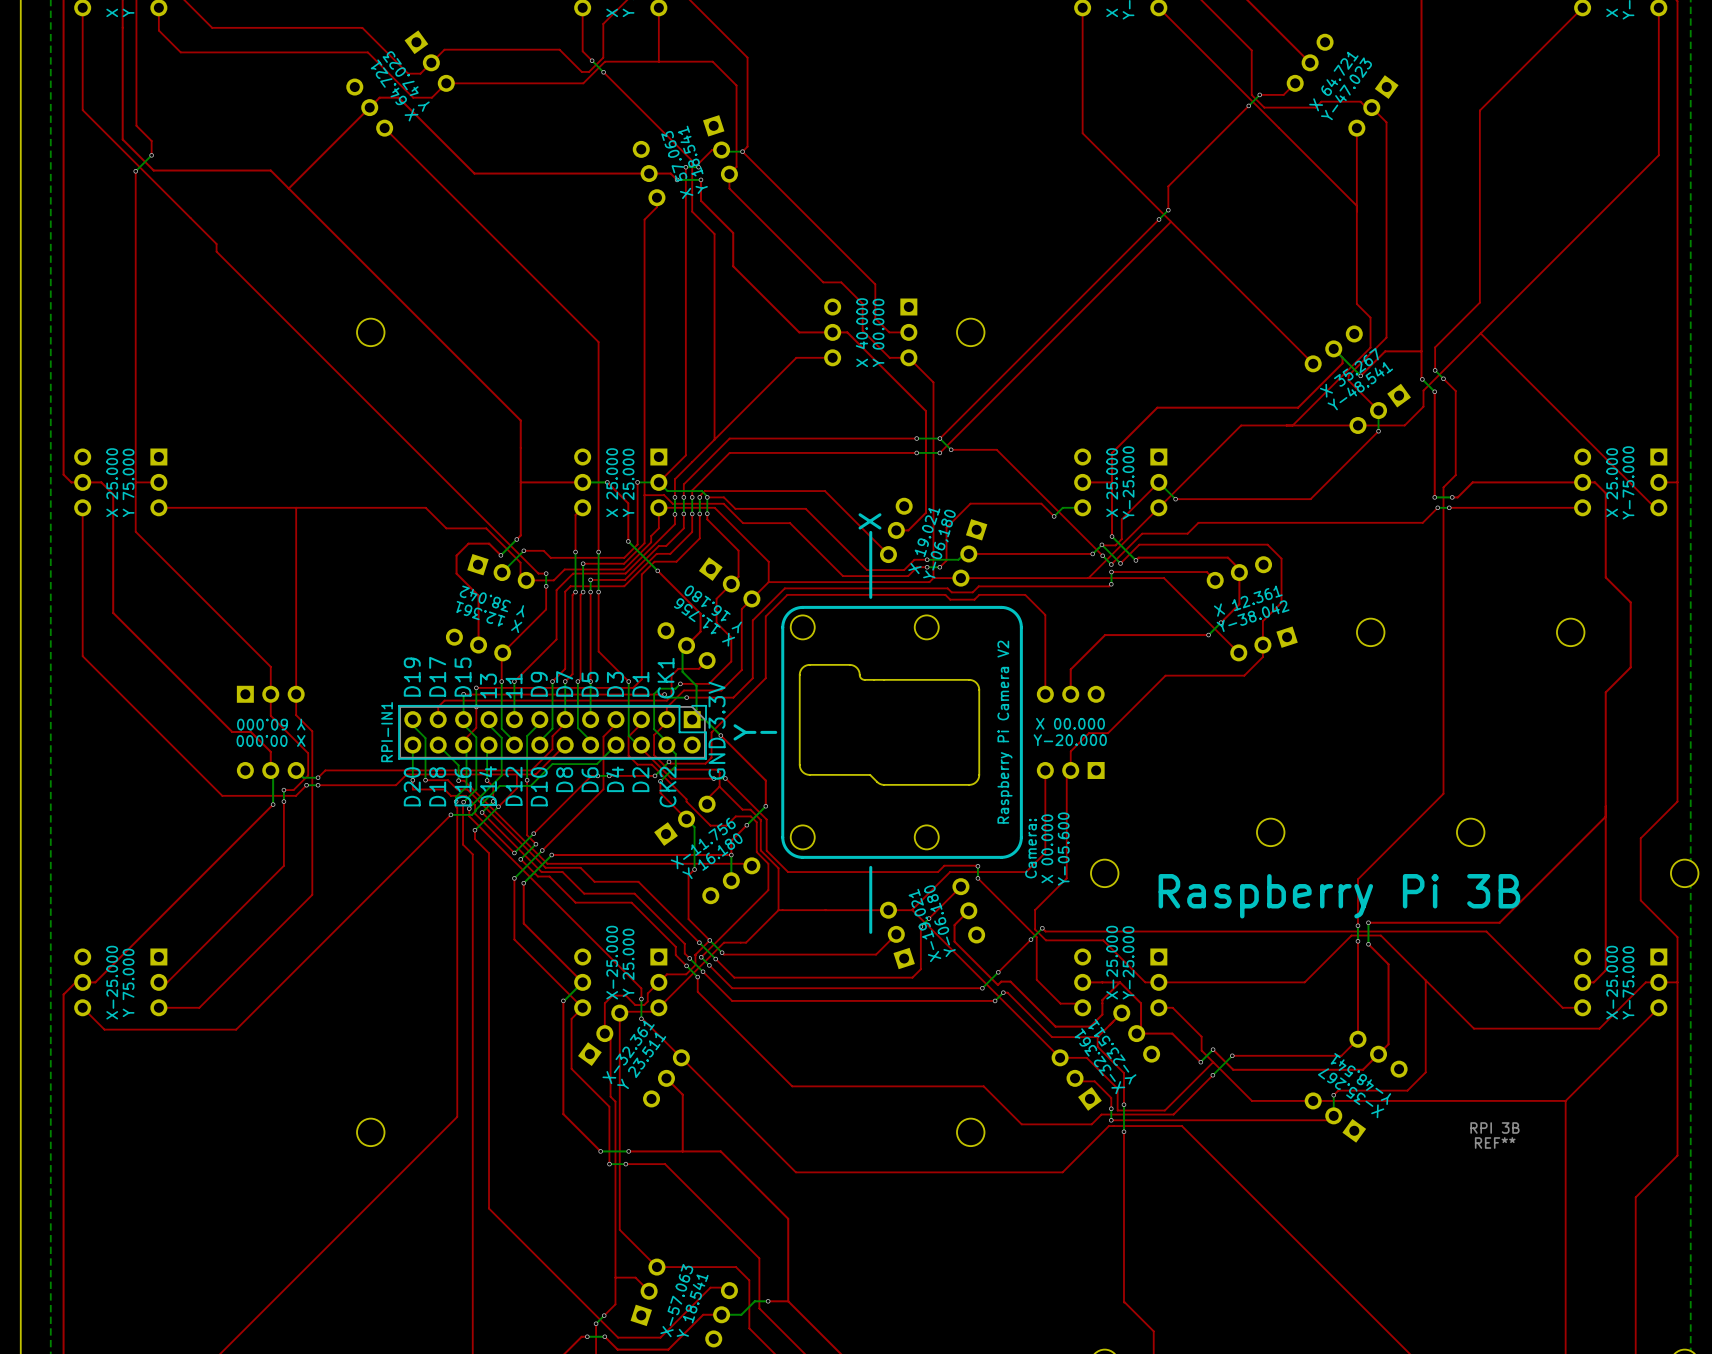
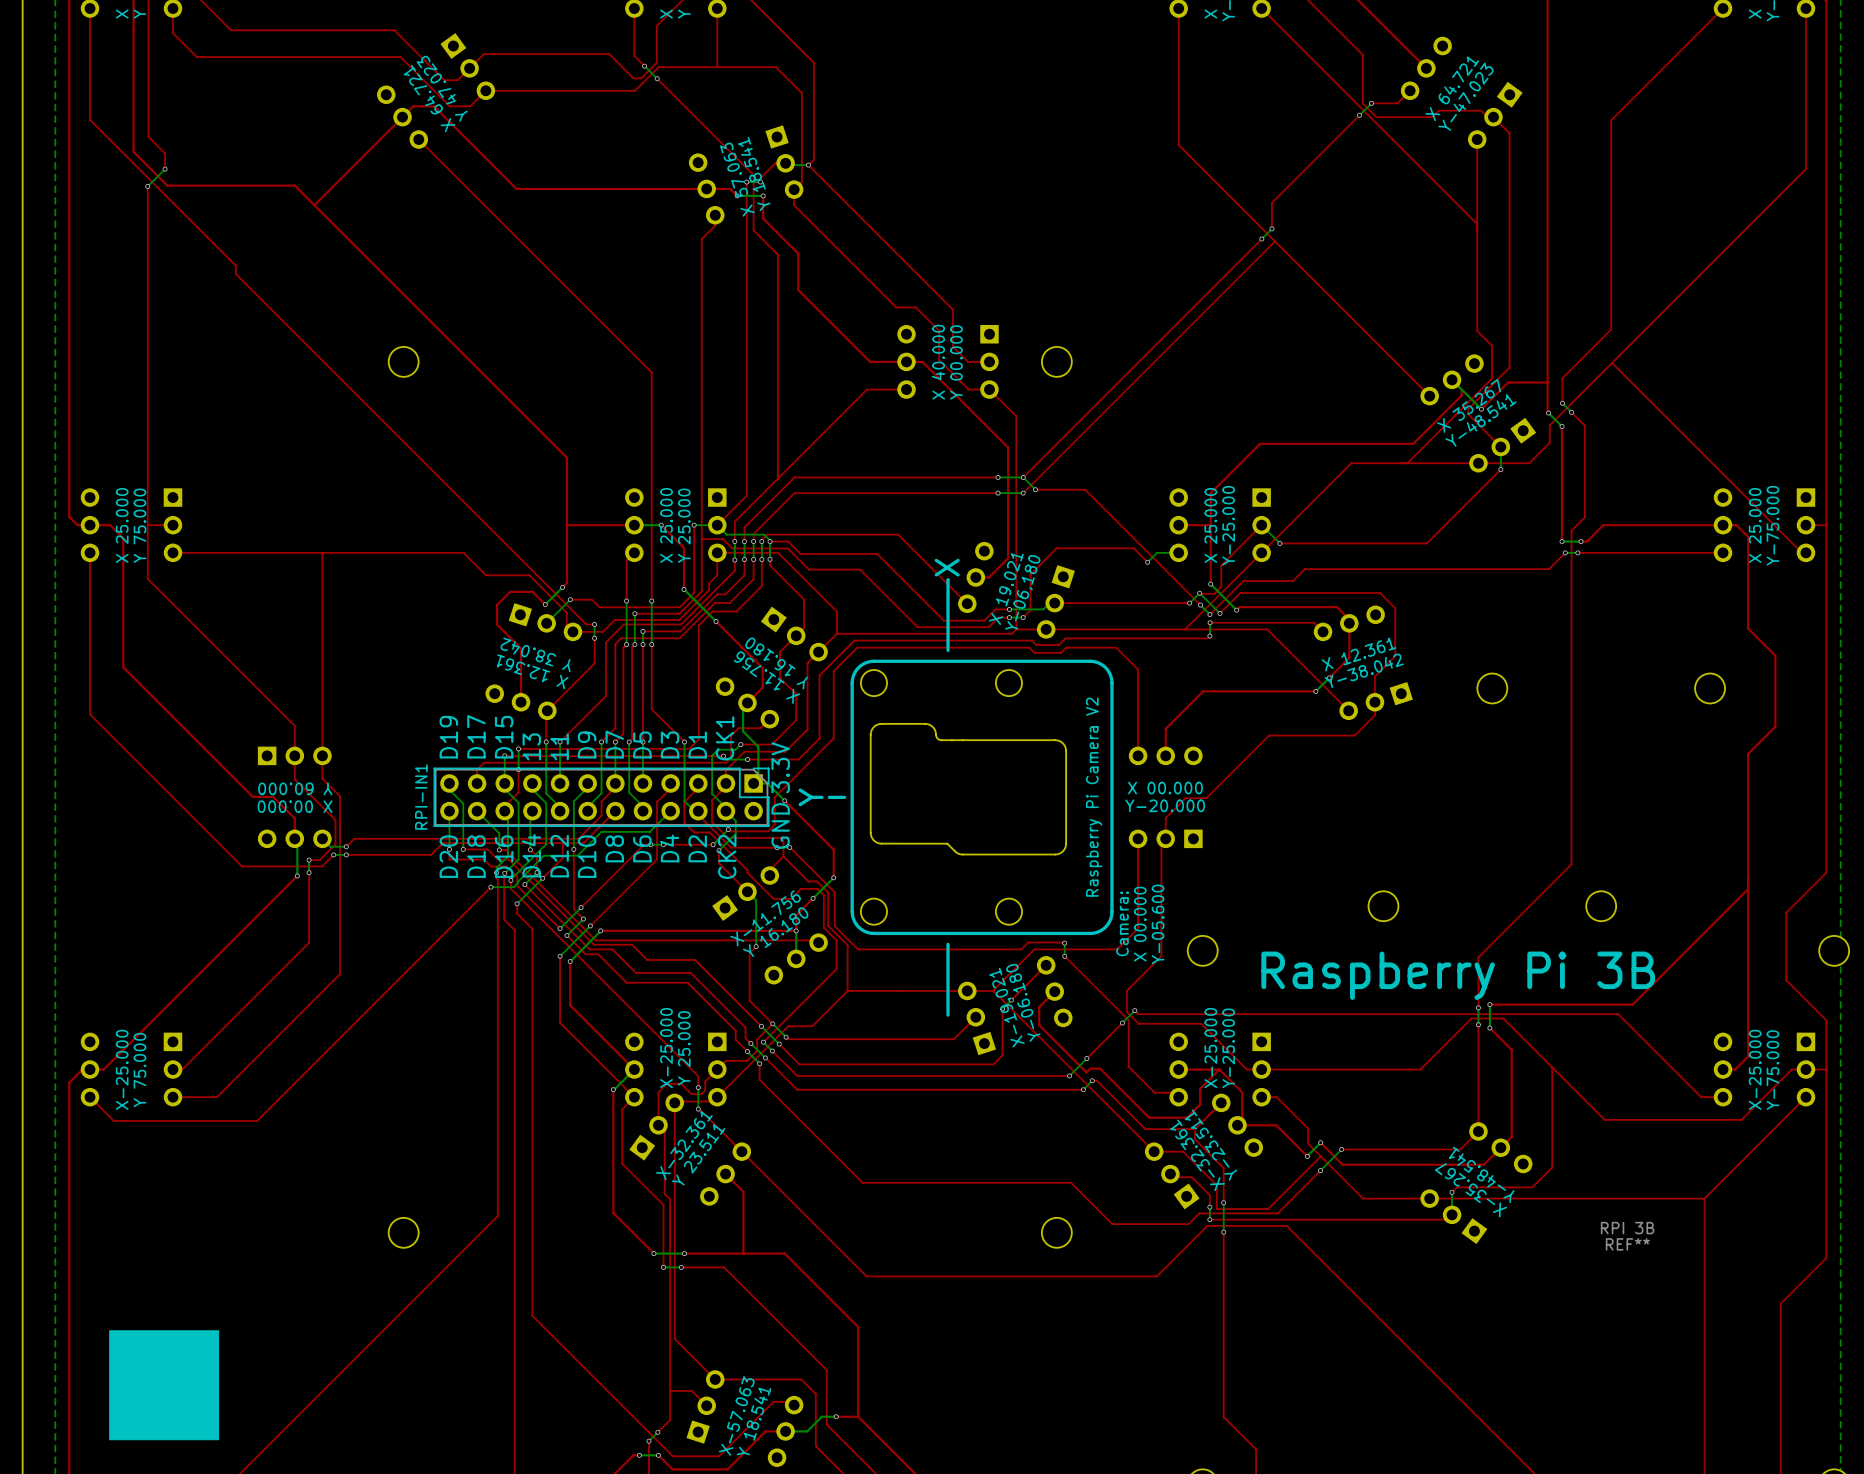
drawing: none -> [109, 1330, 220, 1441]

